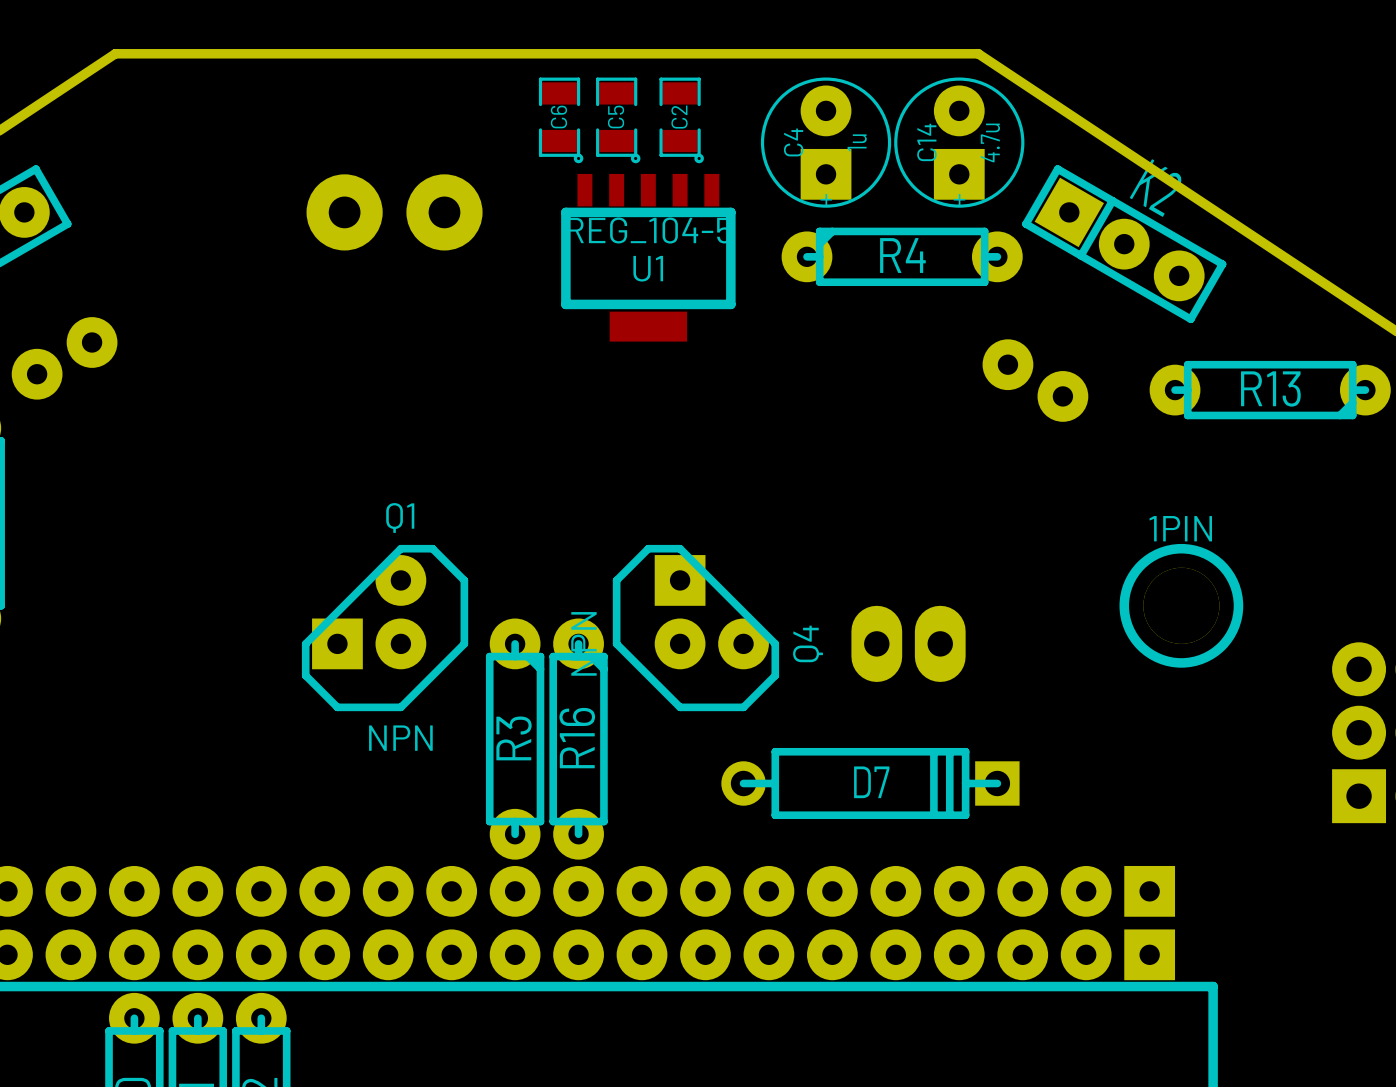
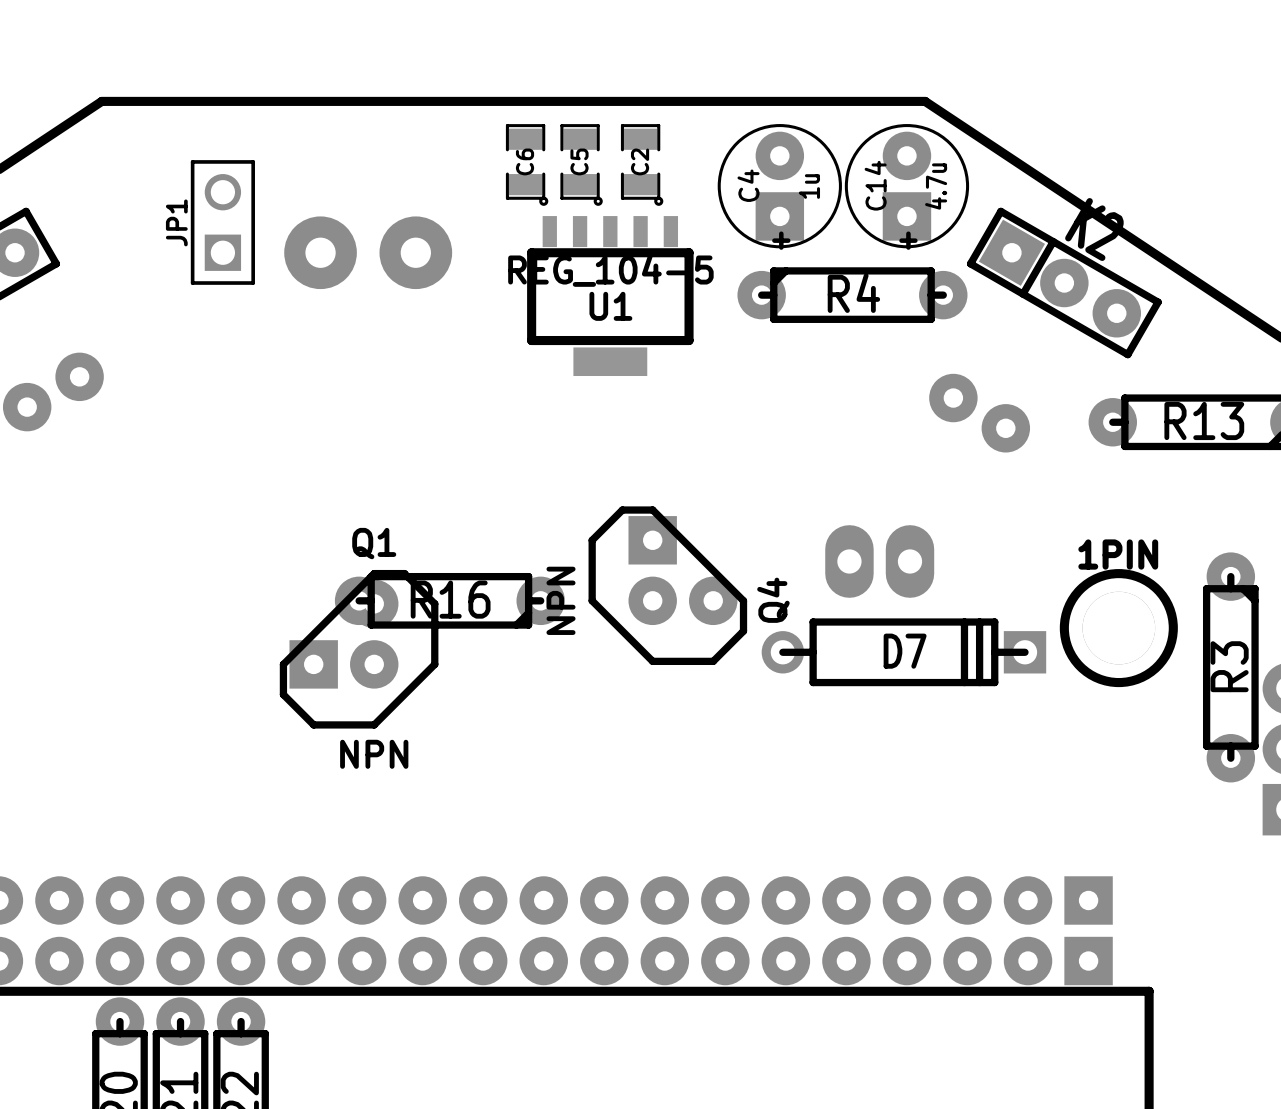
JP1: none -> (222, 222)
Q4 position: (695, 628) -> (667, 585)
part position: (908, 643) -> (879, 561)
R3 position: (515, 739) -> (1230, 667)
R16 rotation: 0° (578, 739) -> 90° clockwise (449, 600)
R16 position: (578, 739) -> (449, 600)
D7 position: (870, 783) -> (903, 652)

